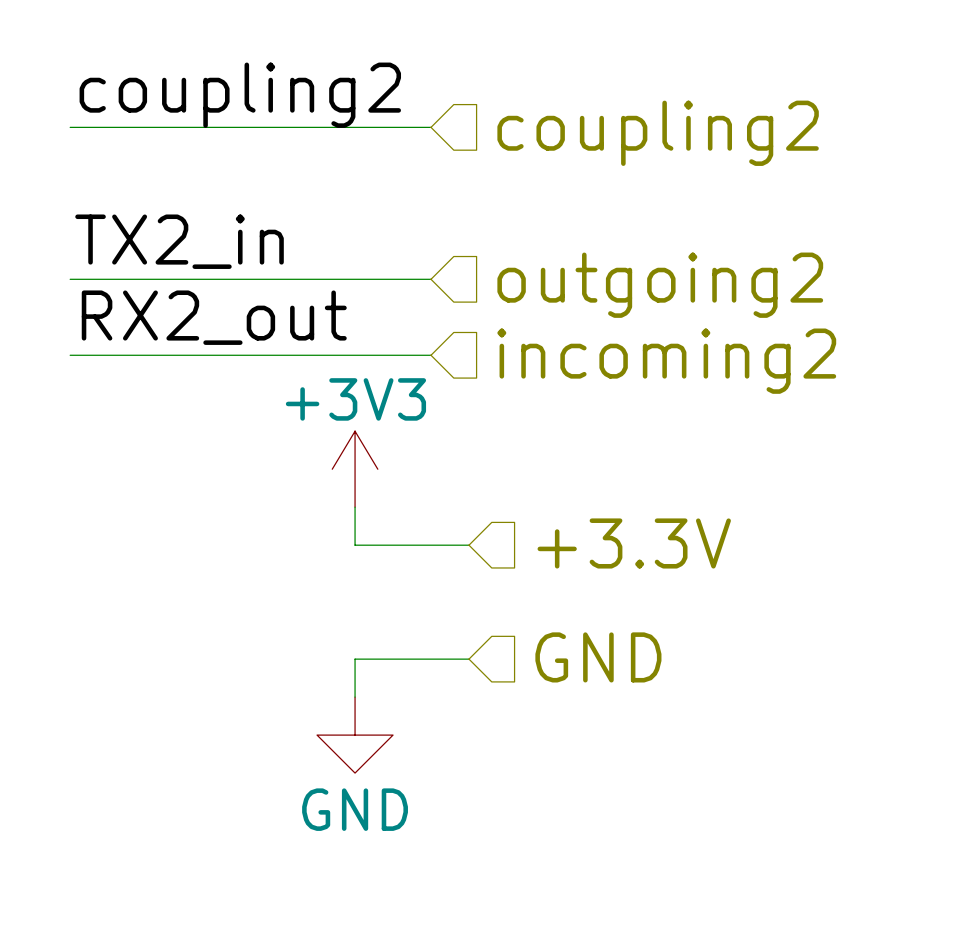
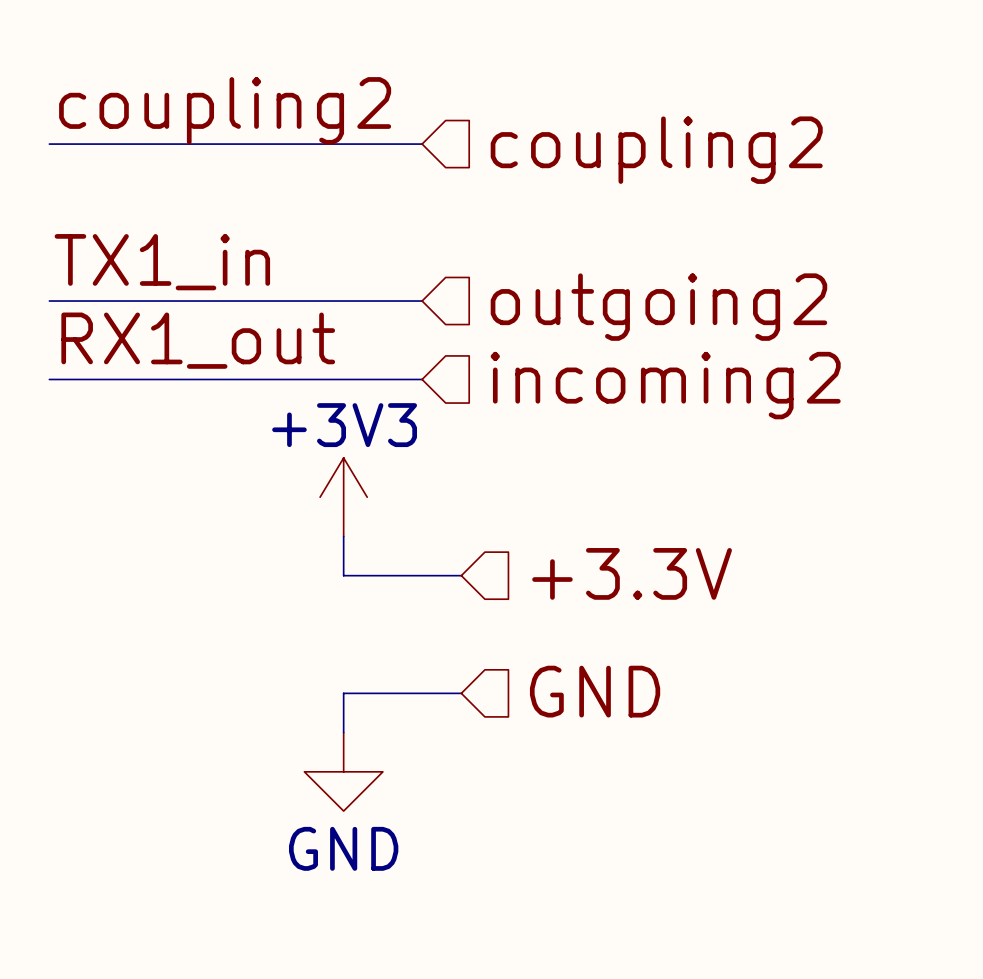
label: TX2_in (179, 241) -> TX1_in (162, 262)
label: RX2_out (214, 317) -> RX1_out (198, 340)

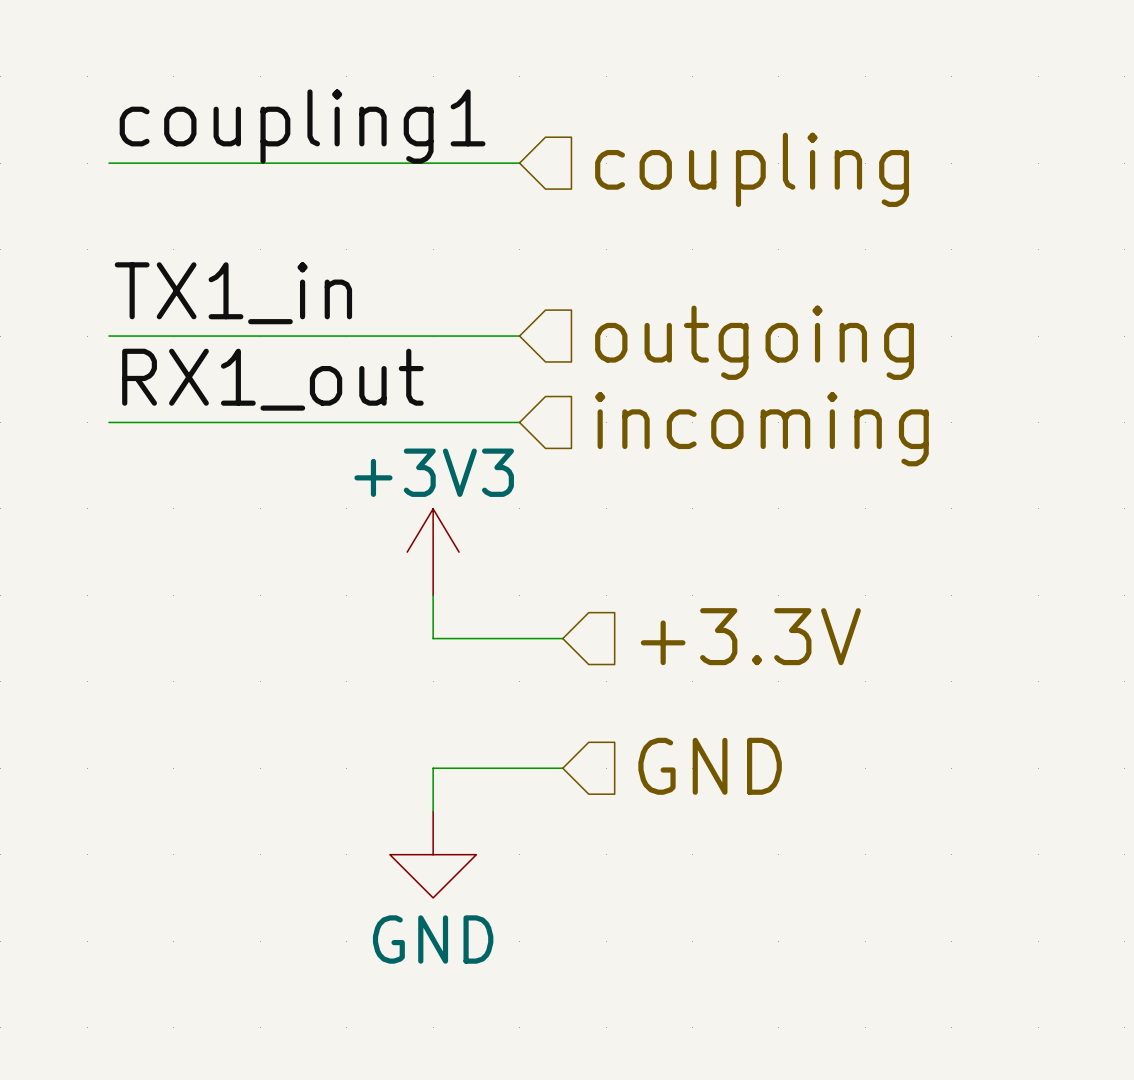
label: coupling2 (225, 110) -> coupling1 (302, 126)
hierarchical label: coupling2 (656, 150) -> coupling (752, 169)
hierarchical label: outgoing2 (658, 307) -> outgoing (754, 342)
hierarchical label: incoming2 (665, 385) -> incoming (761, 429)

